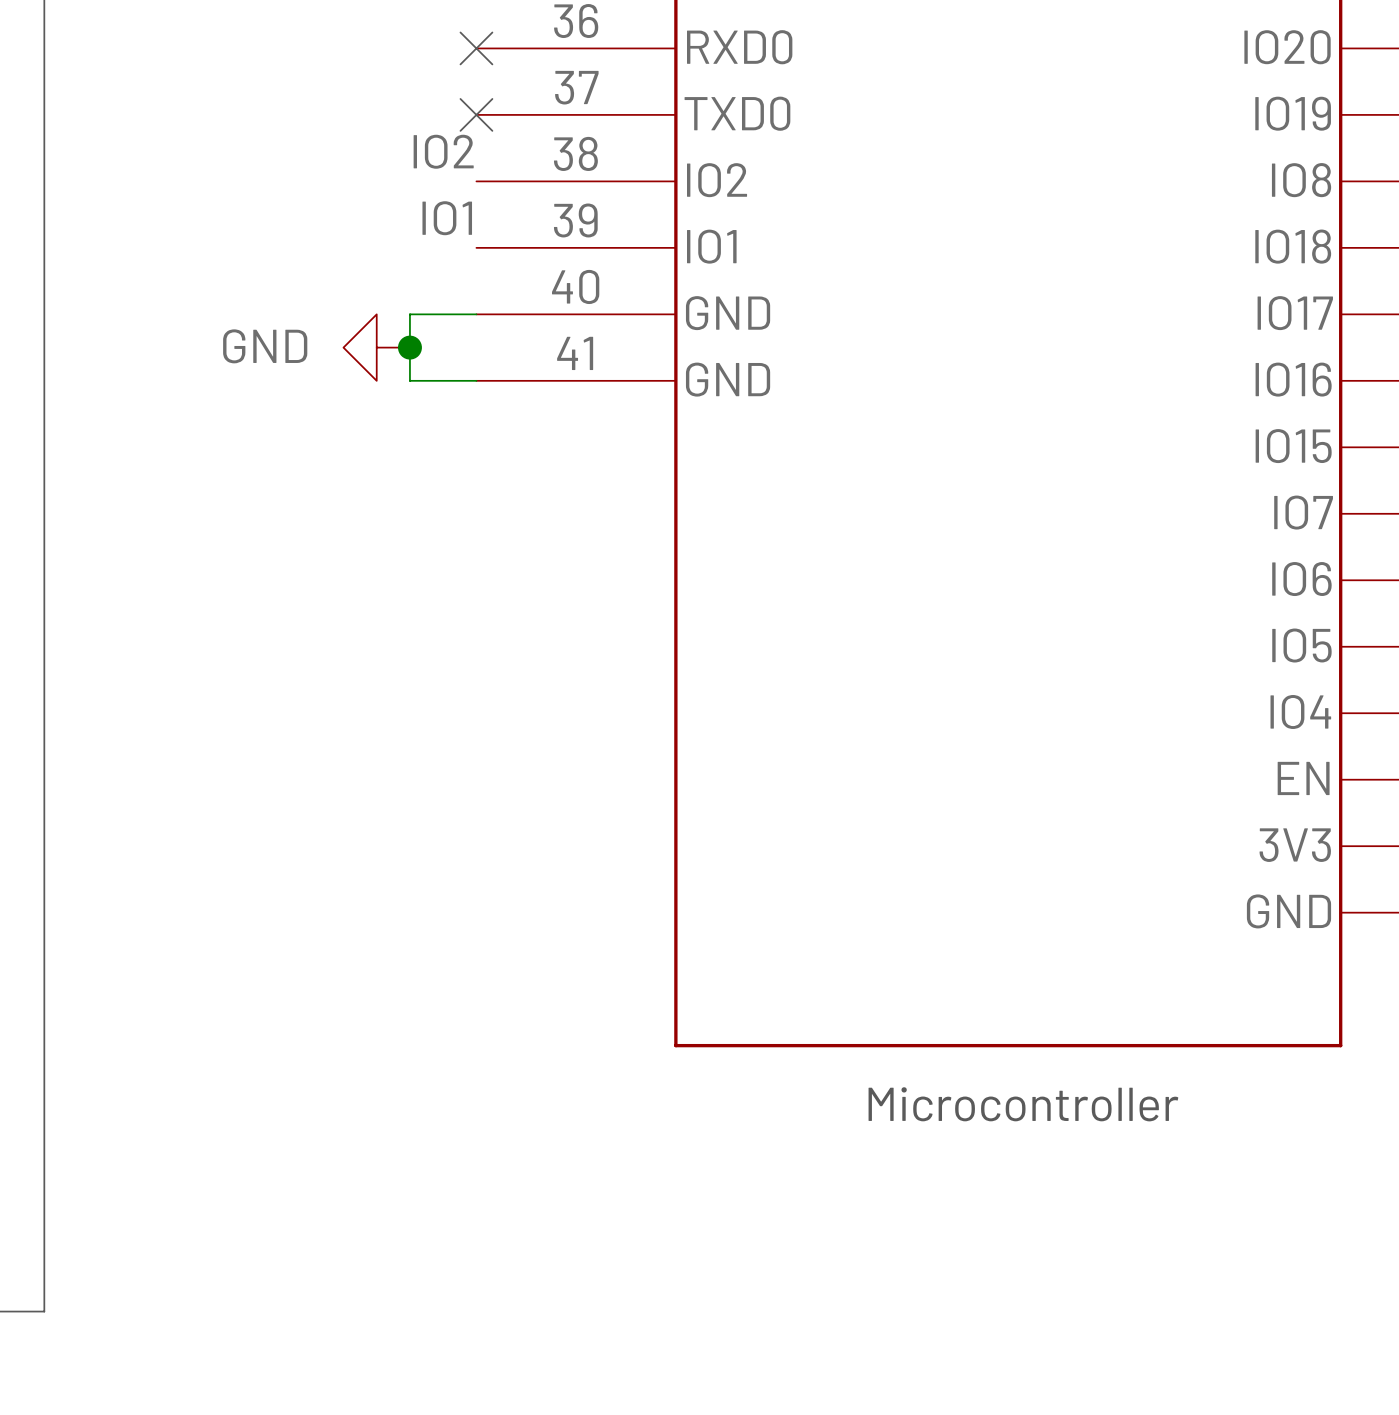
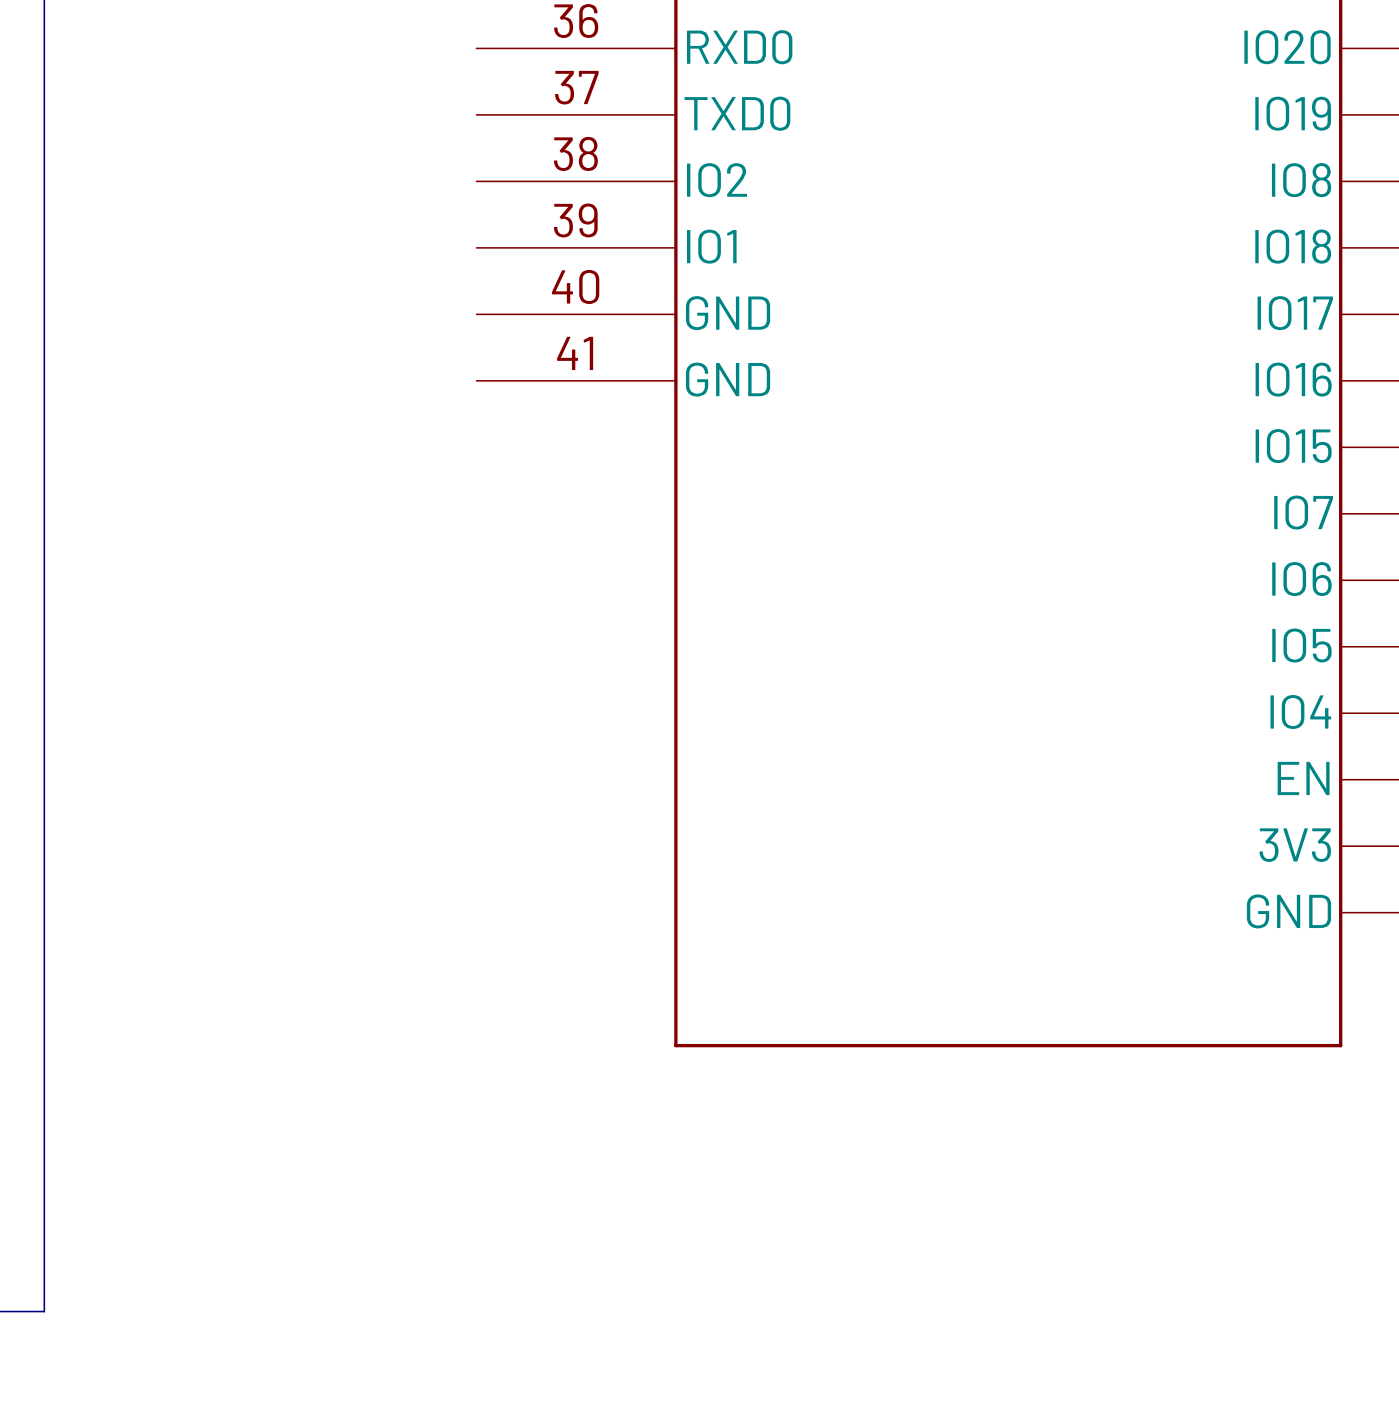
no-connect mark: (476, 48) -> none
no-connect mark: (476, 114) -> none
label: IO2 (443, 151) -> none
label: IO1 (447, 218) -> none
wire: (476, 314) (409, 314) (409, 380) (476, 380) -> none
power symbol: GND (376, 347) -> none
junction: (409, 347) -> none
text: Microcontroller (1023, 1104) -> none

